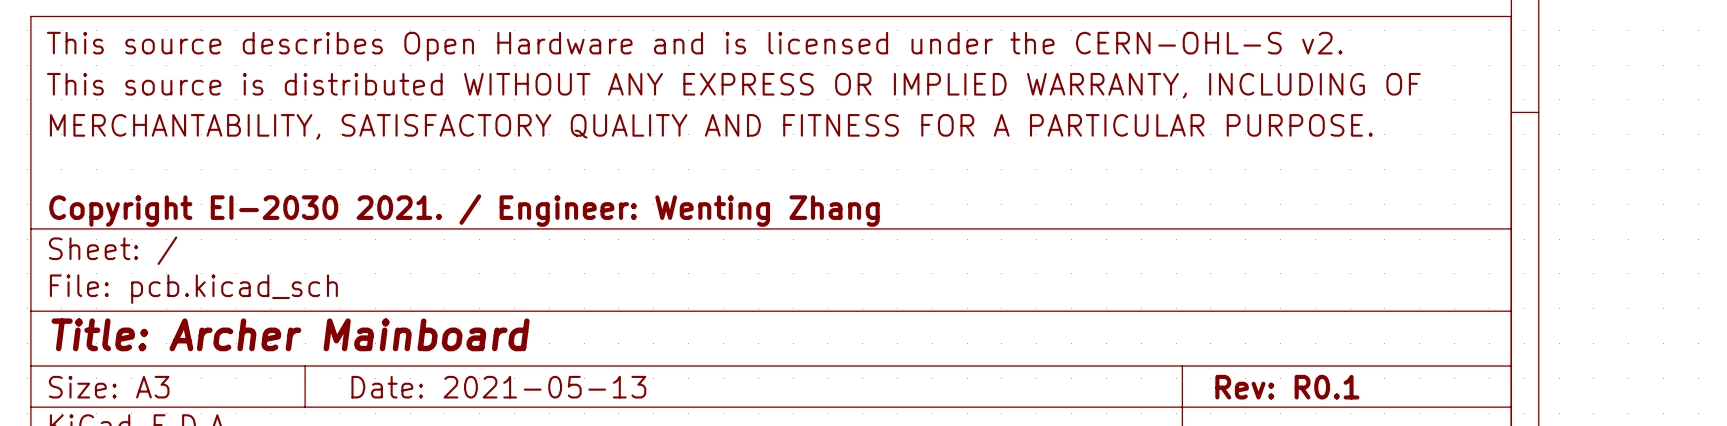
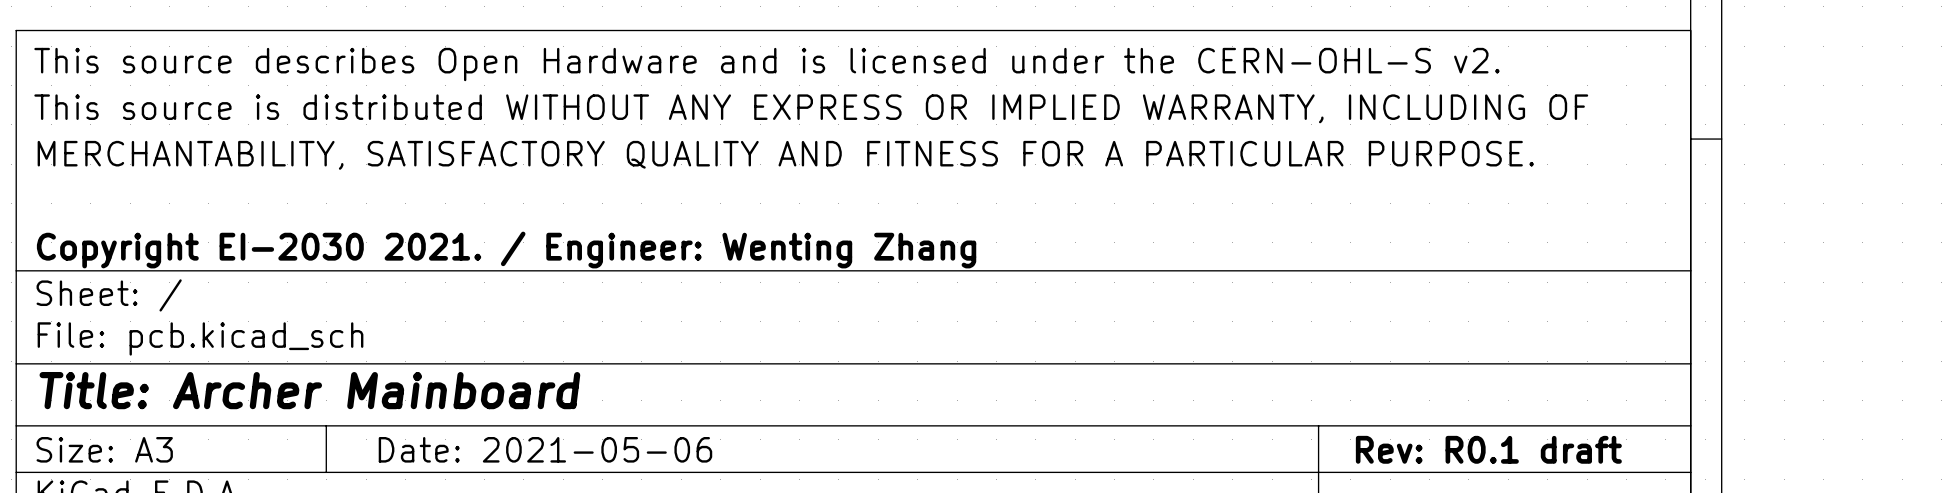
title block: Date: 2021-05-13 (498, 387) -> Date: 2021-05-06 (545, 449)
title block: Rev: R0.1 (1287, 387) -> Rev: R0.1 draft (1488, 449)

